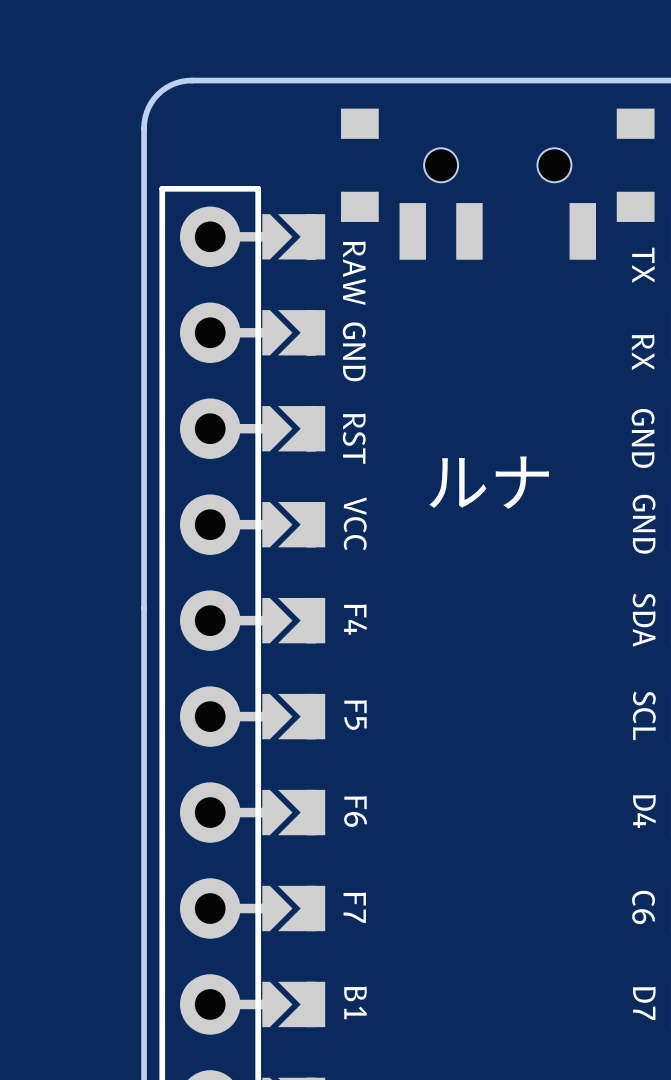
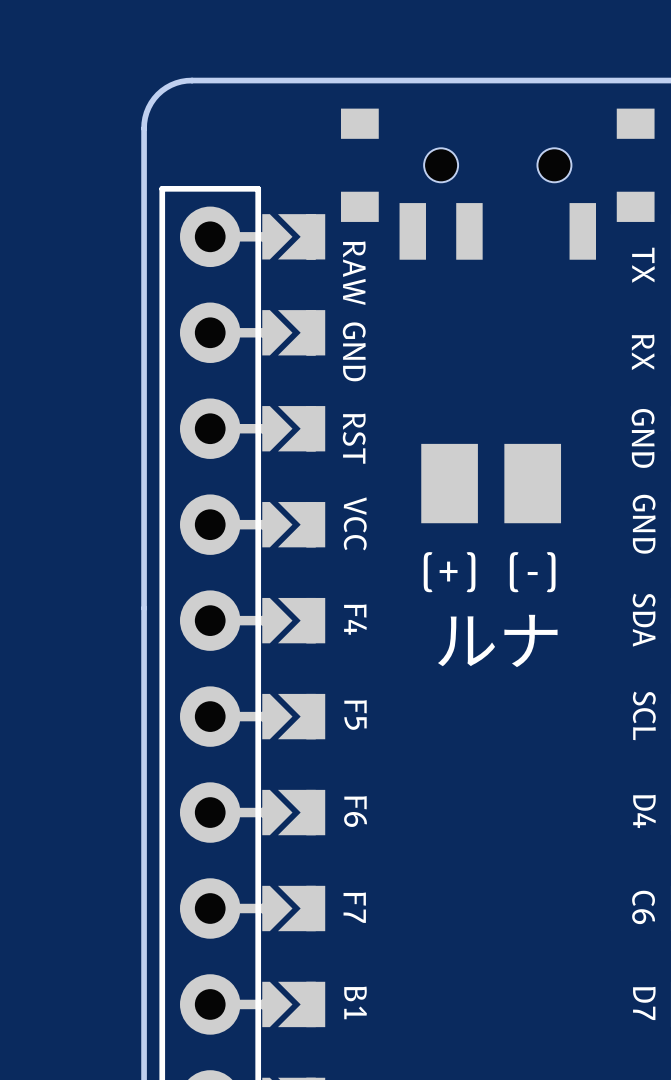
text position: ルナ (489, 482) -> ルナ (497, 640)
part: none -> (491, 483)

